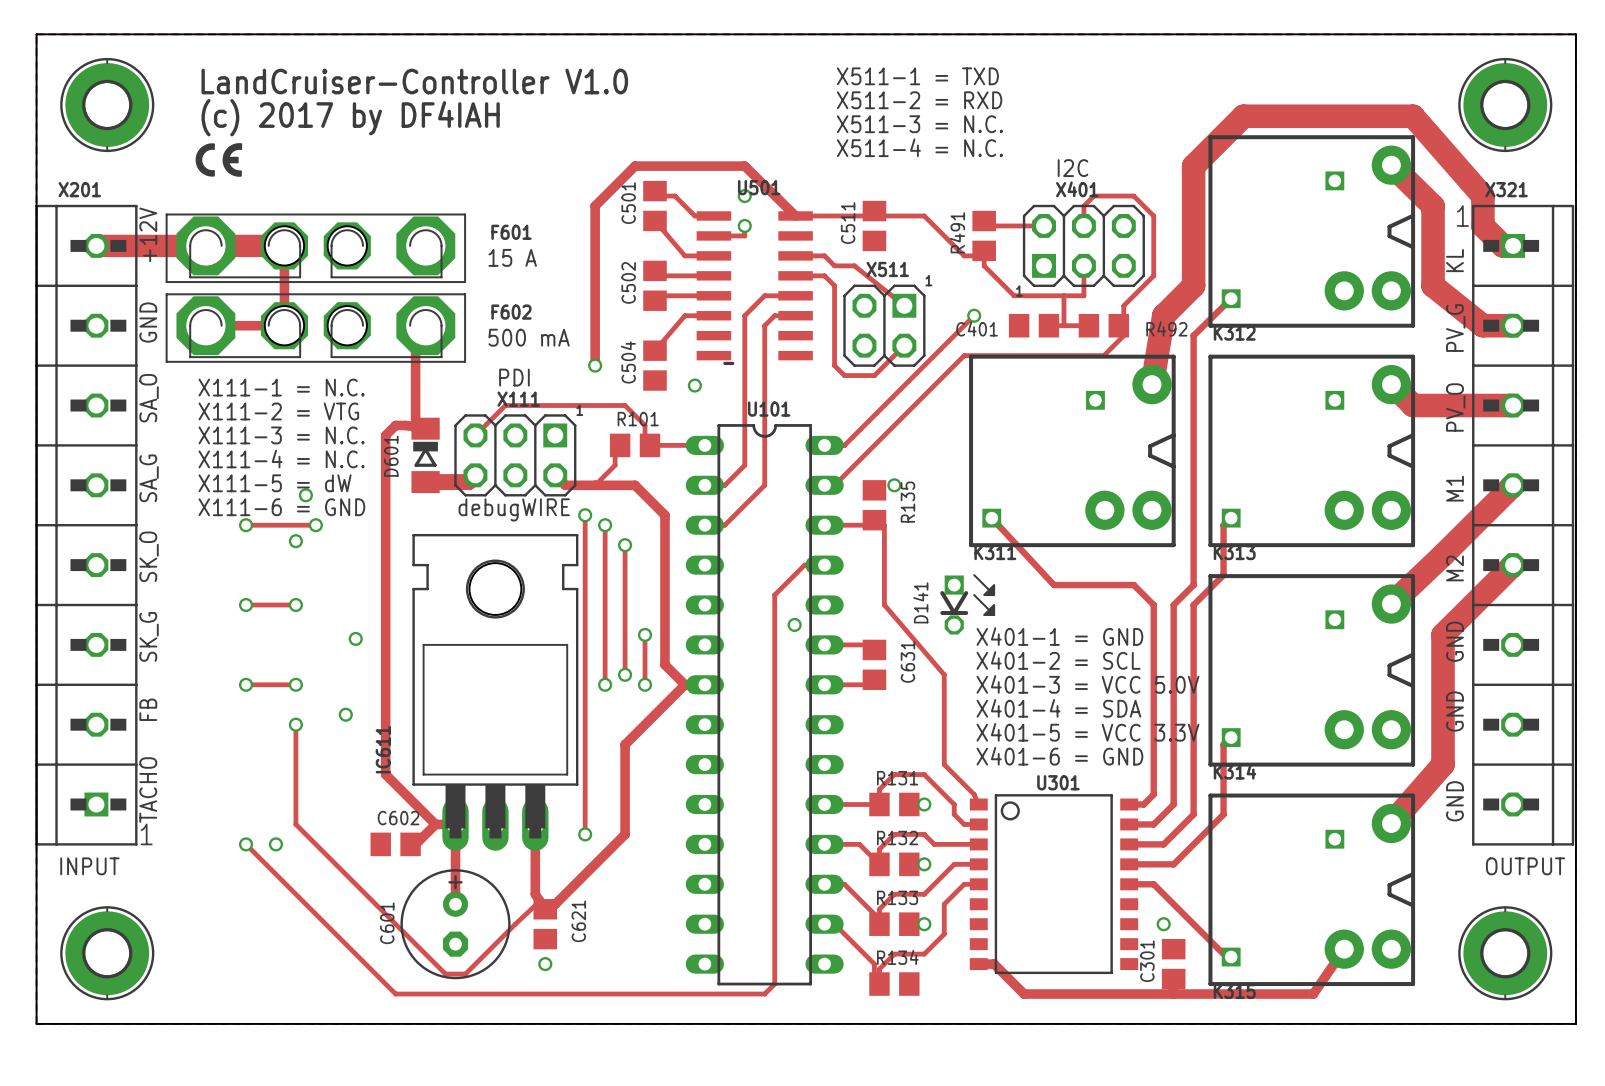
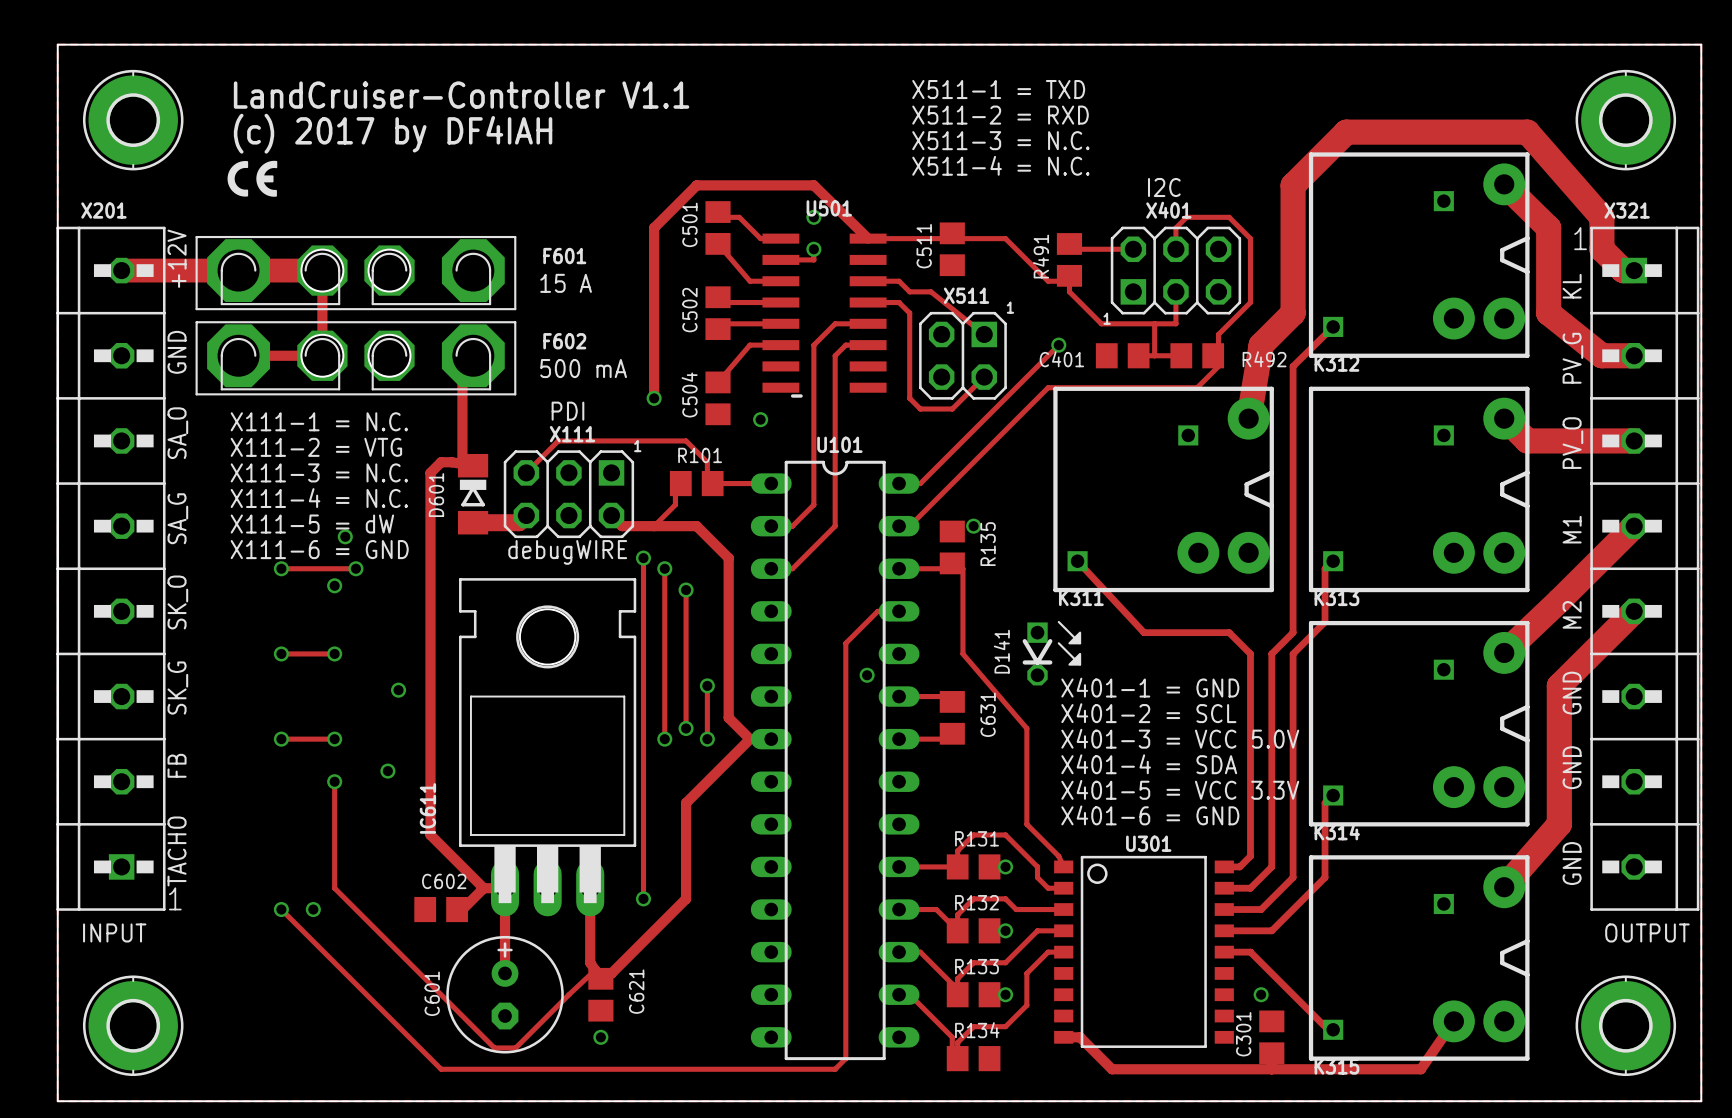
text: LandCruiser-Controller V1.0 (414, 81) -> LandCruiser-Controller V1.1 (461, 95)

